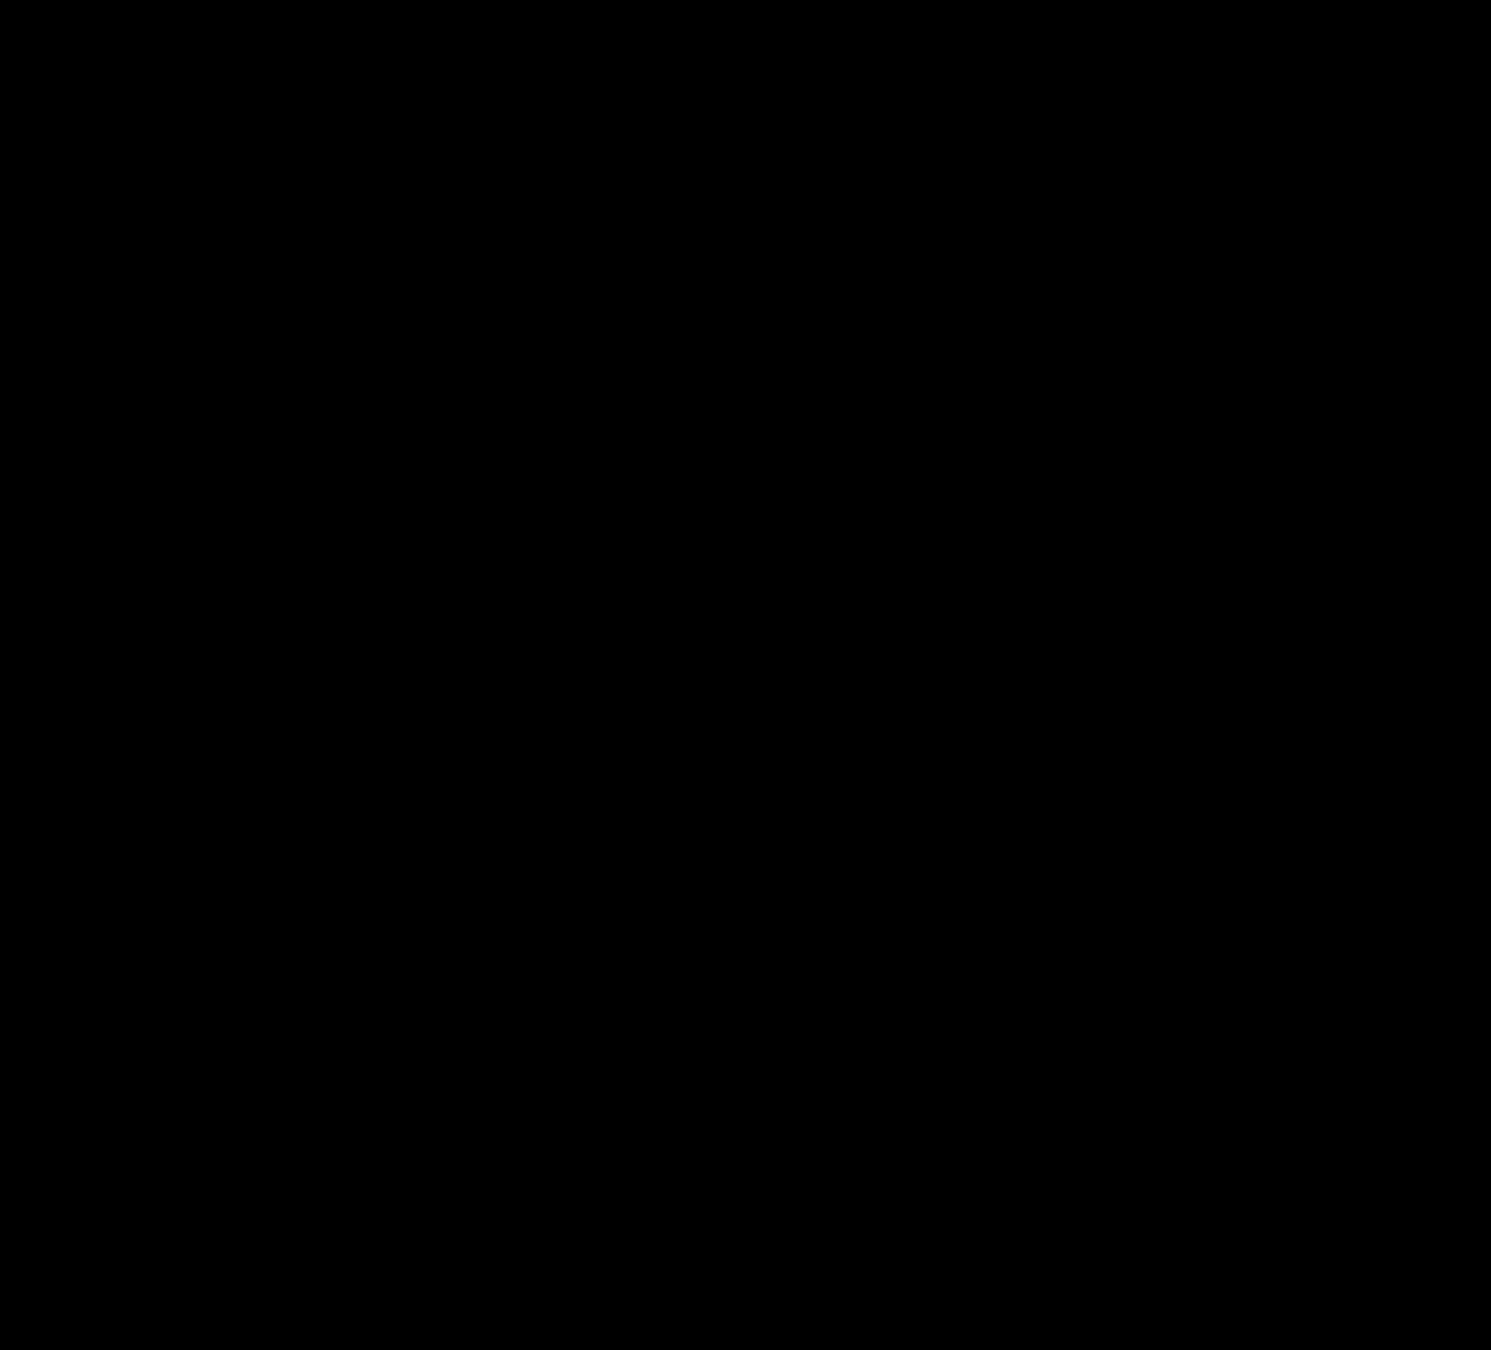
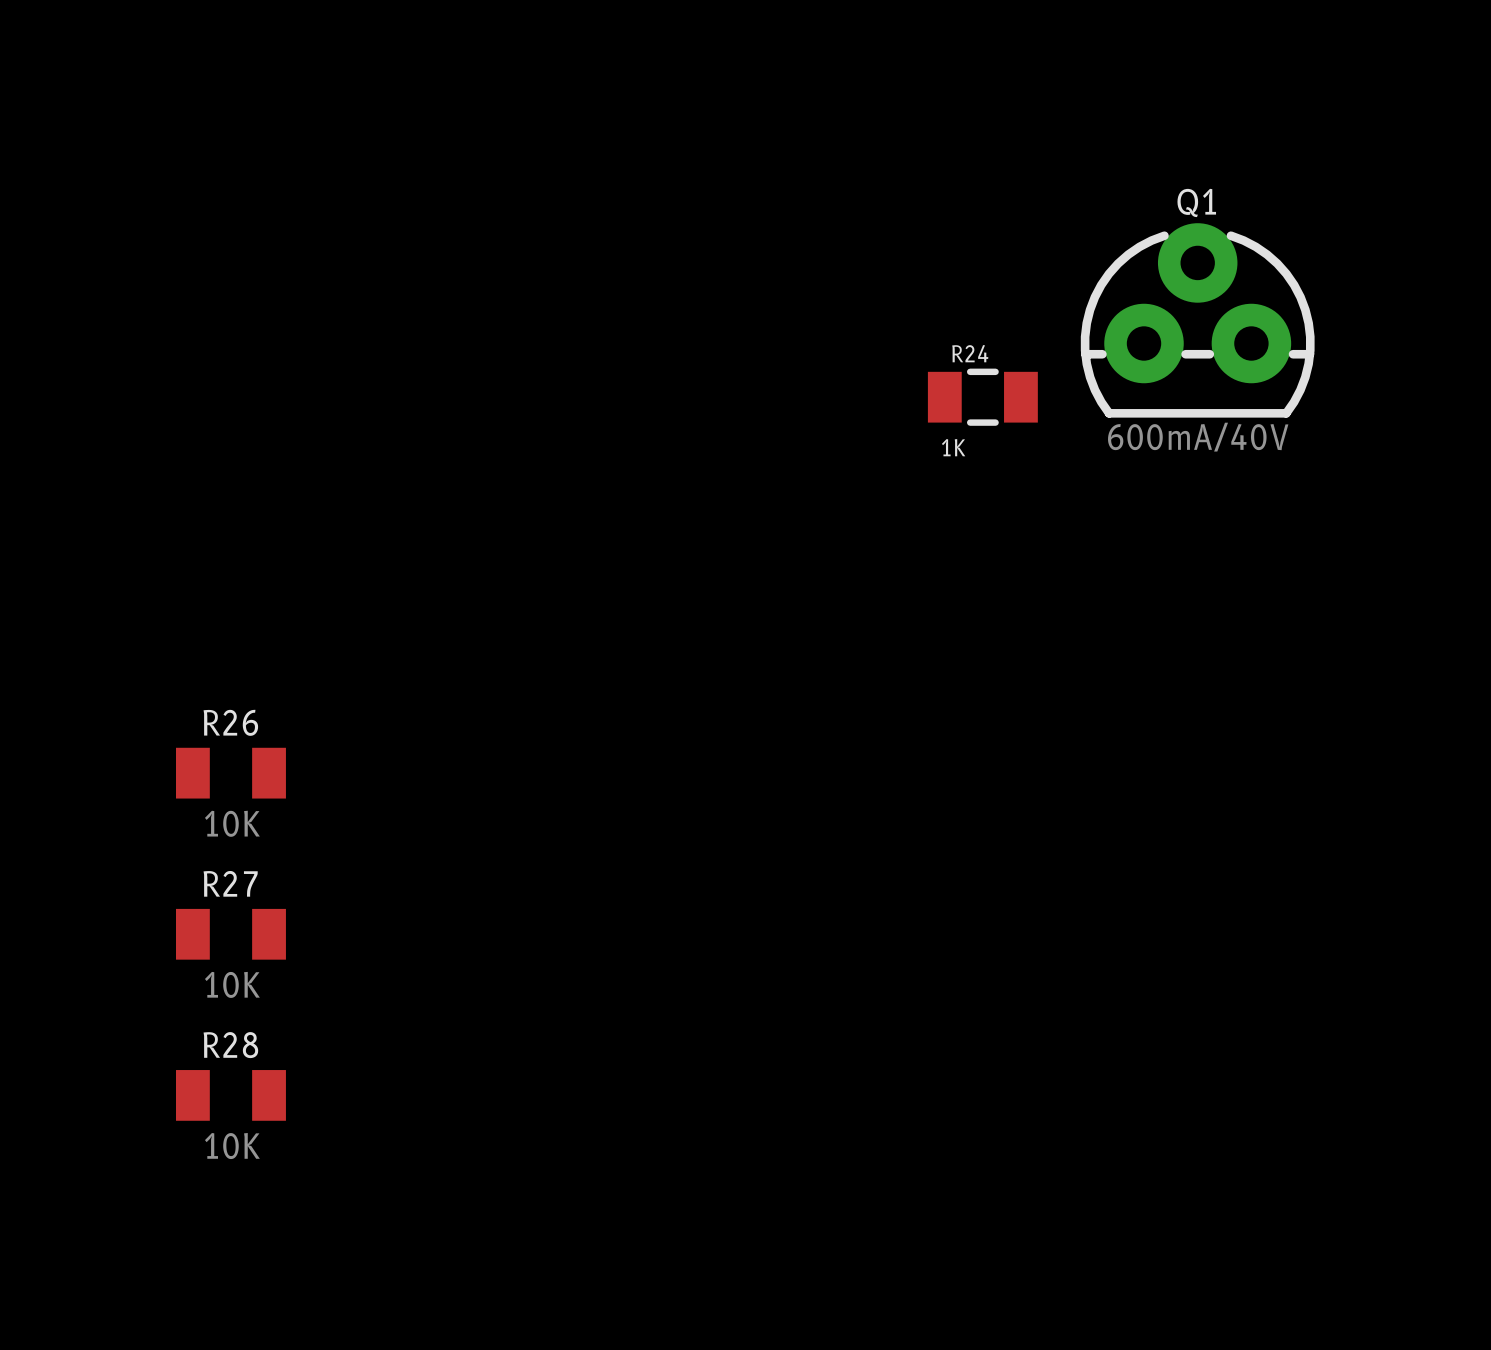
Q1: none -> 600mA/40V (1197, 320)
R24: none -> 1K (982, 397)
R26: none -> 10K (230, 773)
R27: none -> 10K (230, 934)
R28: none -> 10K (230, 1095)

